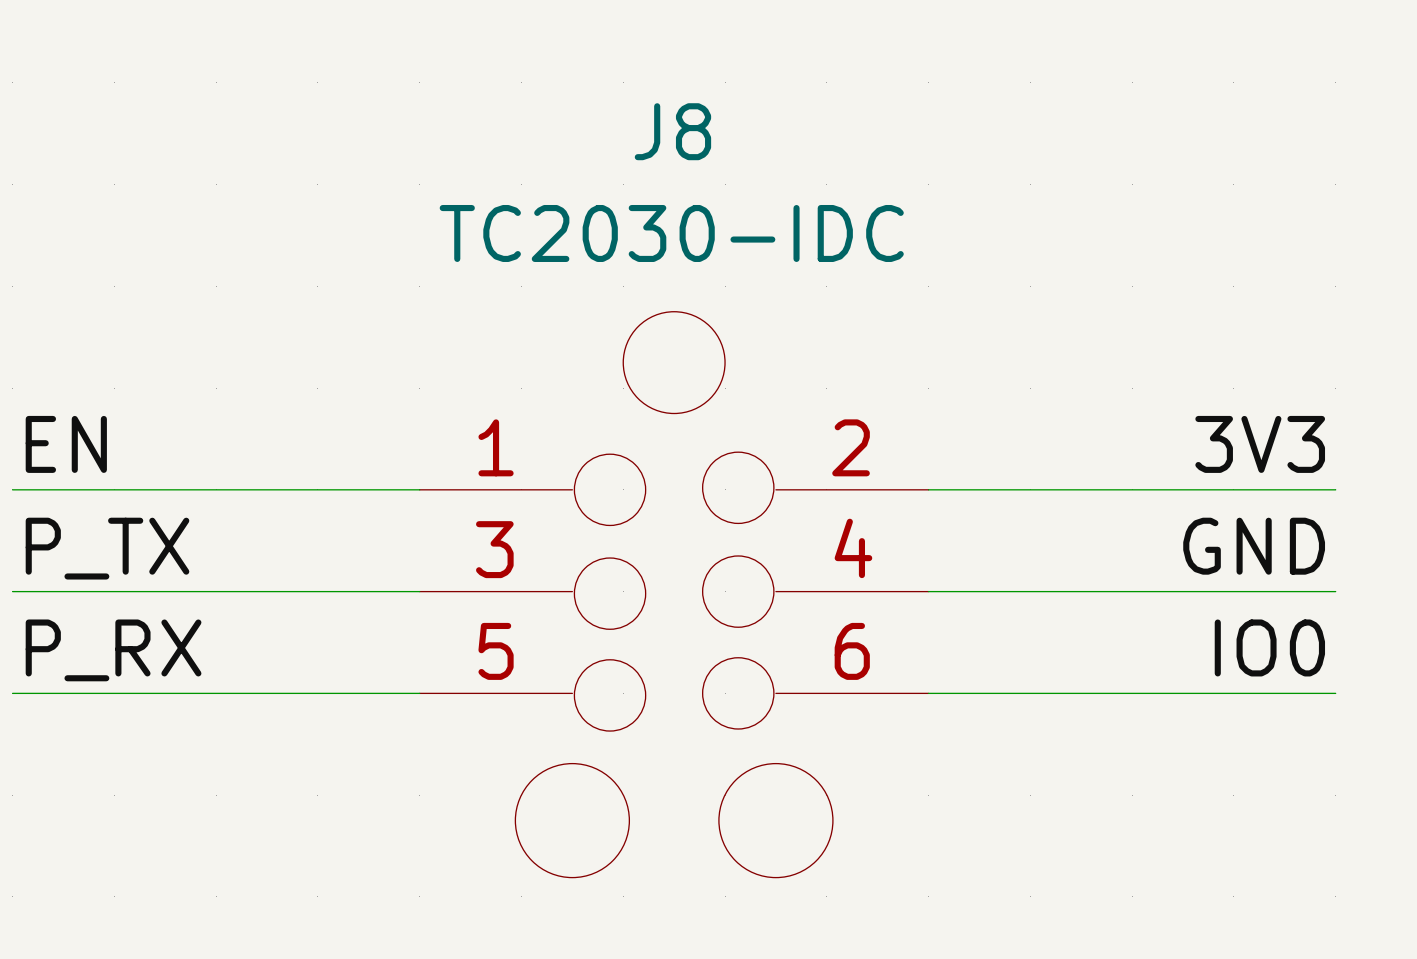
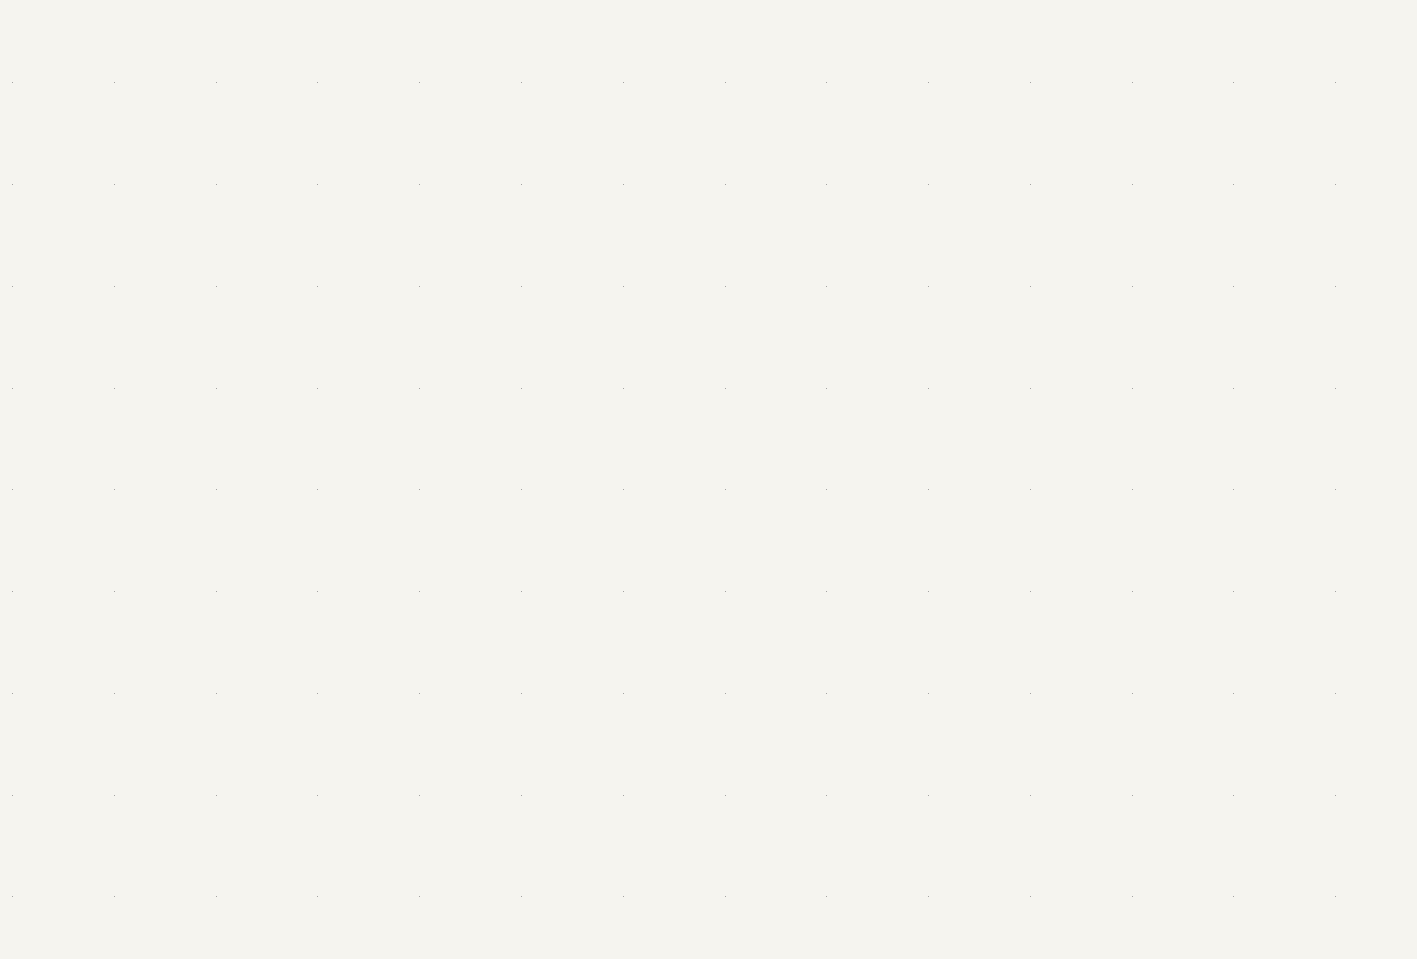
label: EN (66, 444) -> none
label: 3V3 (1260, 444) -> none
wire: (12, 489) (419, 489) -> none
wire: (928, 489) (1335, 489) -> none
label: GND (1254, 546) -> none
label: P_TX (107, 548) -> none
wire: (12, 591) (419, 591) -> none
wire: (928, 591) (1335, 591) -> none
J8: TC2030-IDC (674, 594) -> none
label: IO0 (1269, 647) -> none
label: P_RX (113, 650) -> none
wire: (12, 693) (419, 693) -> none
wire: (928, 693) (1335, 693) -> none

